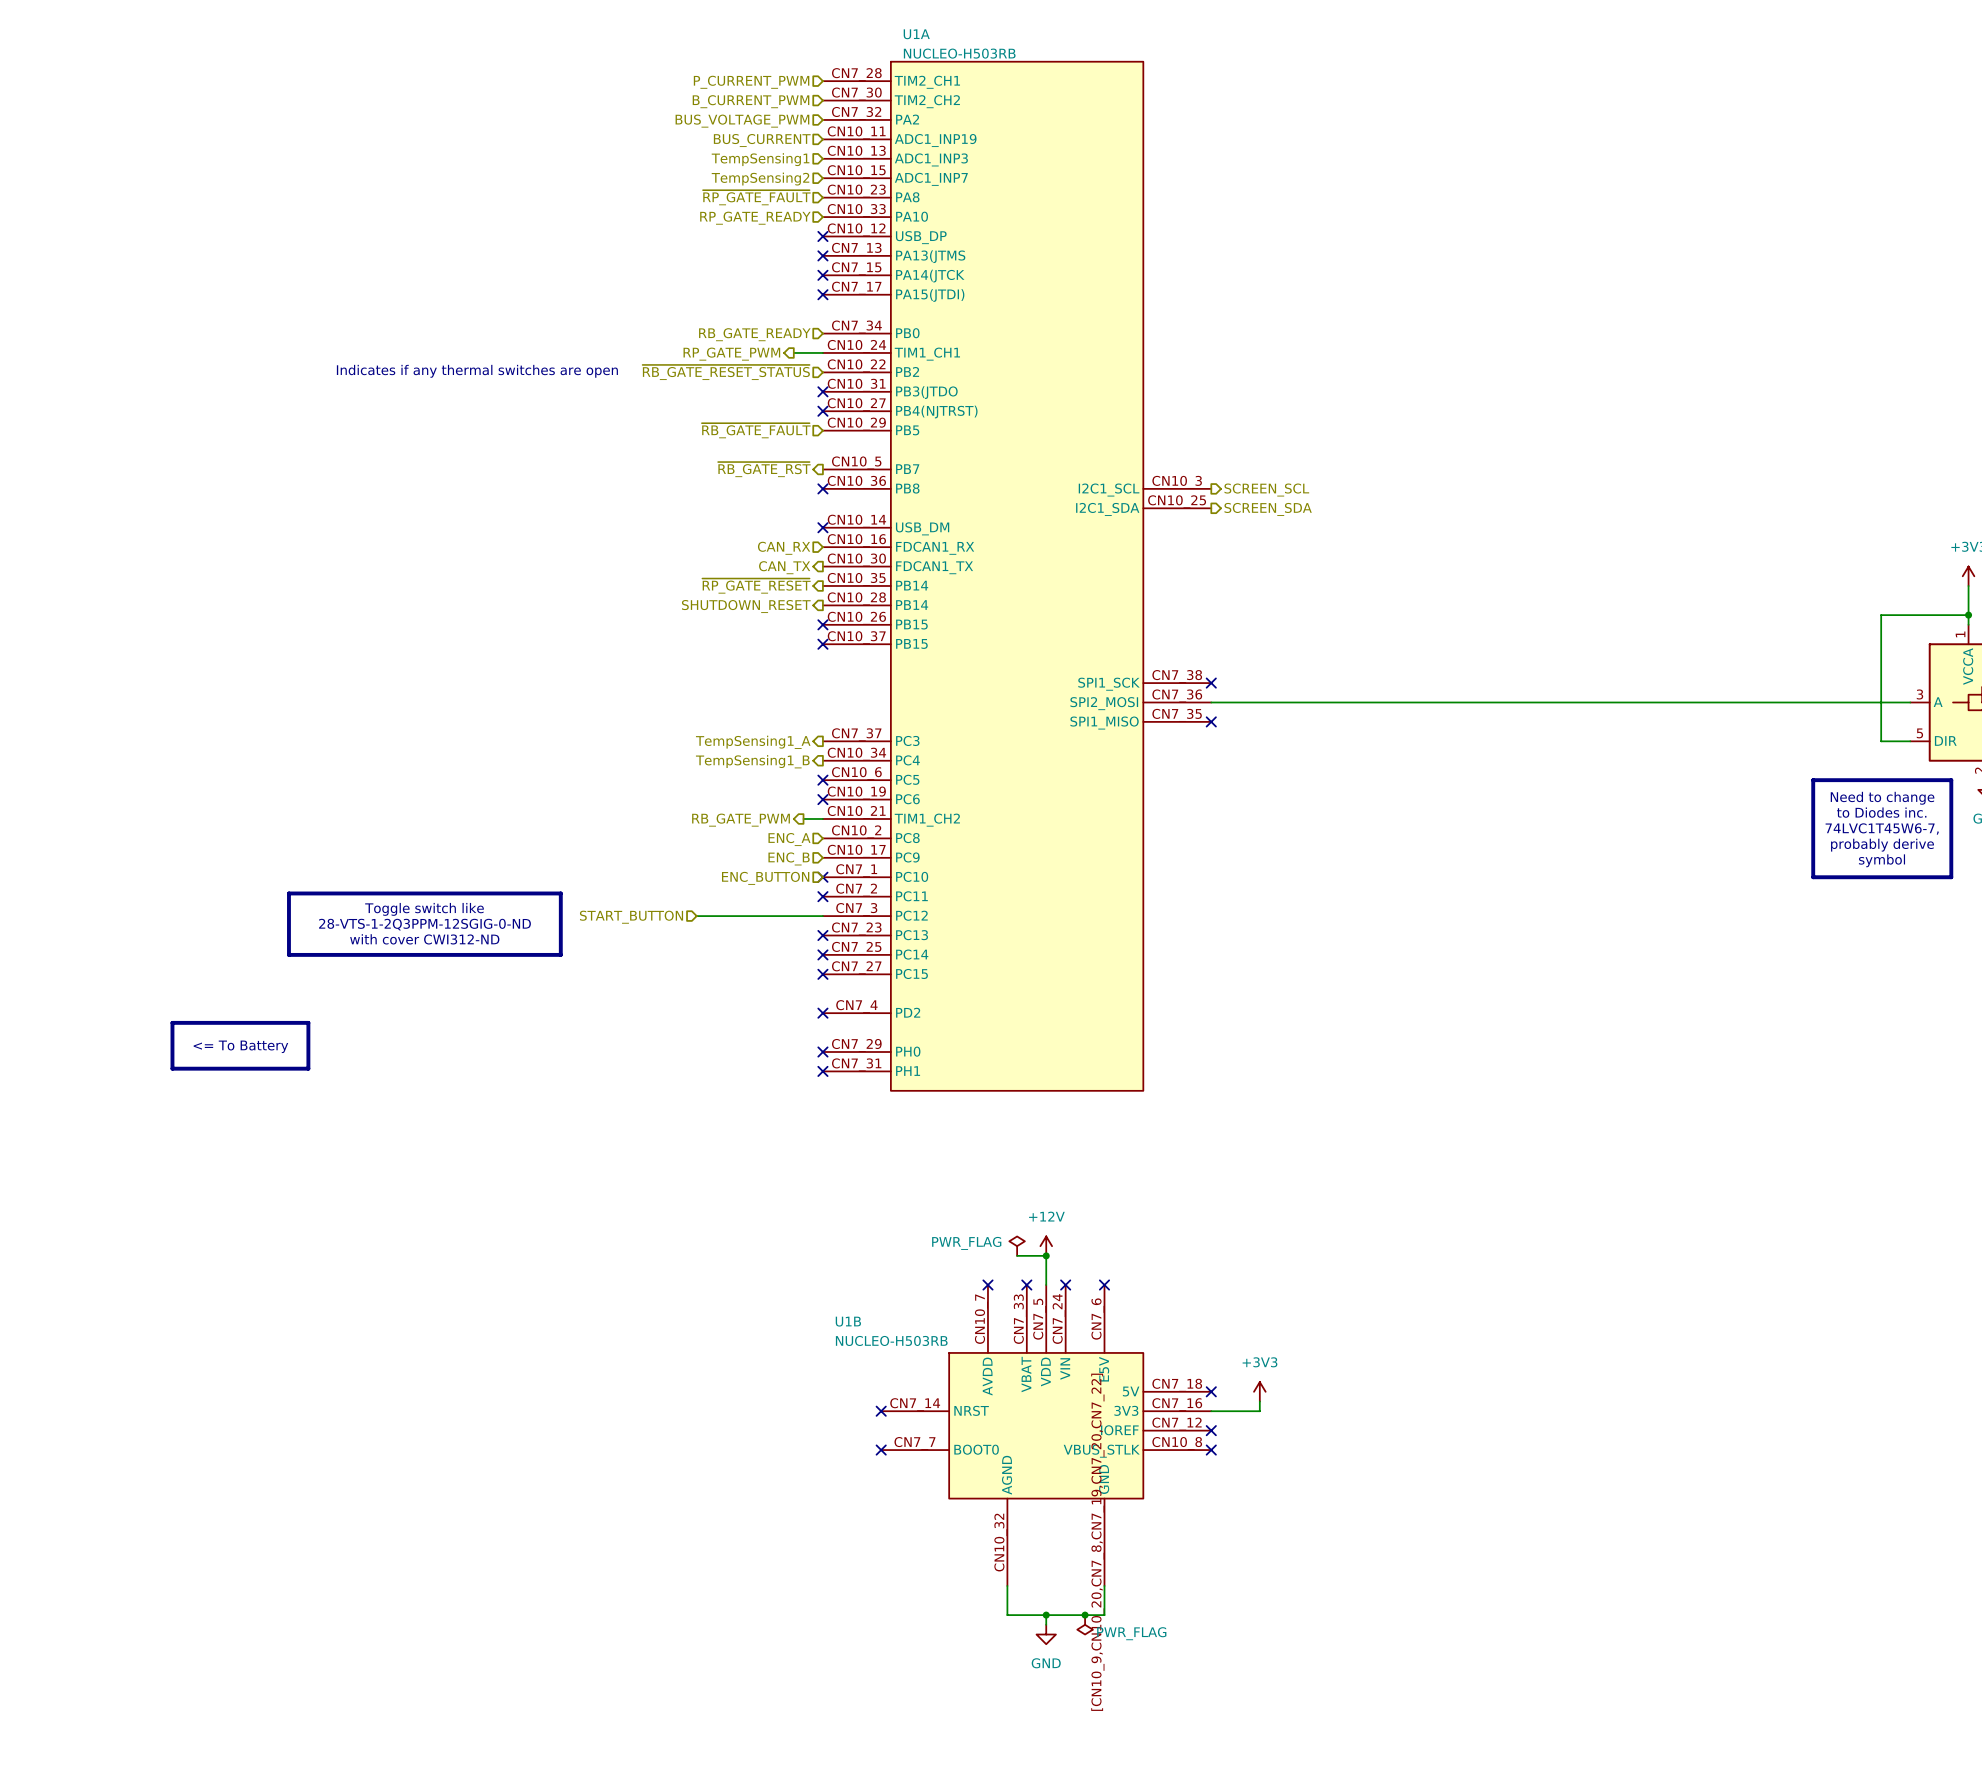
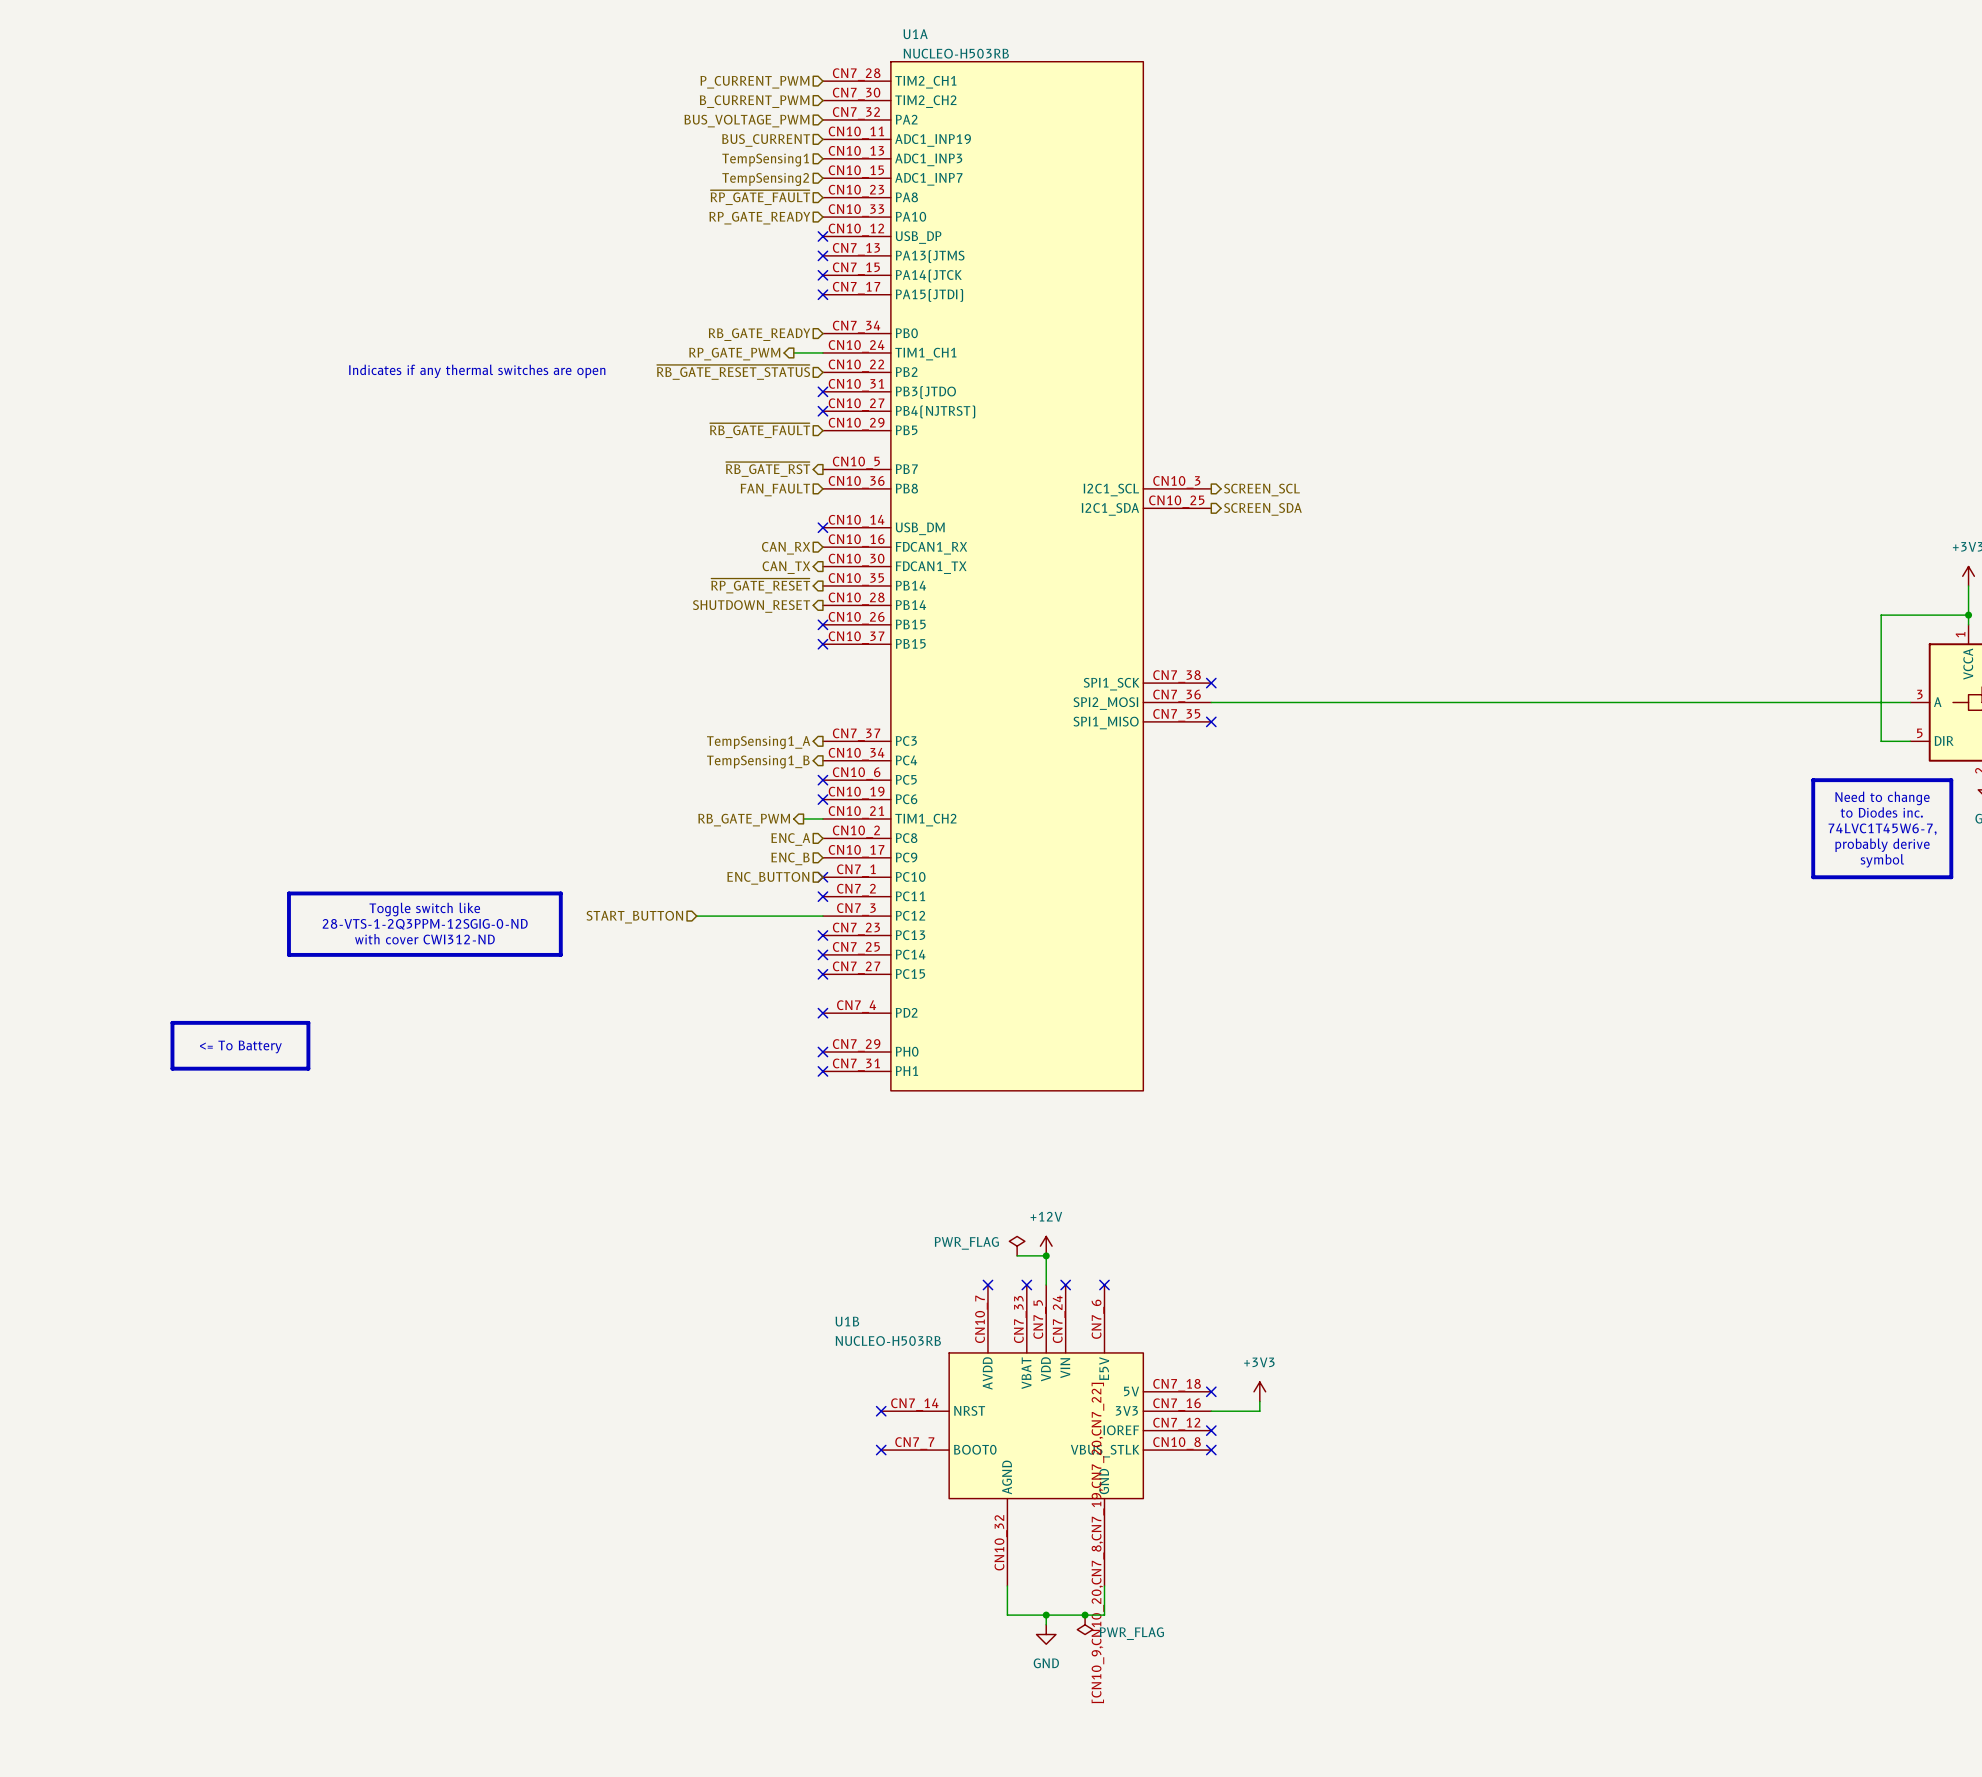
no-connect mark: (822, 488) -> none
hierarchical label: none -> FAN_FAULT (775, 489)

